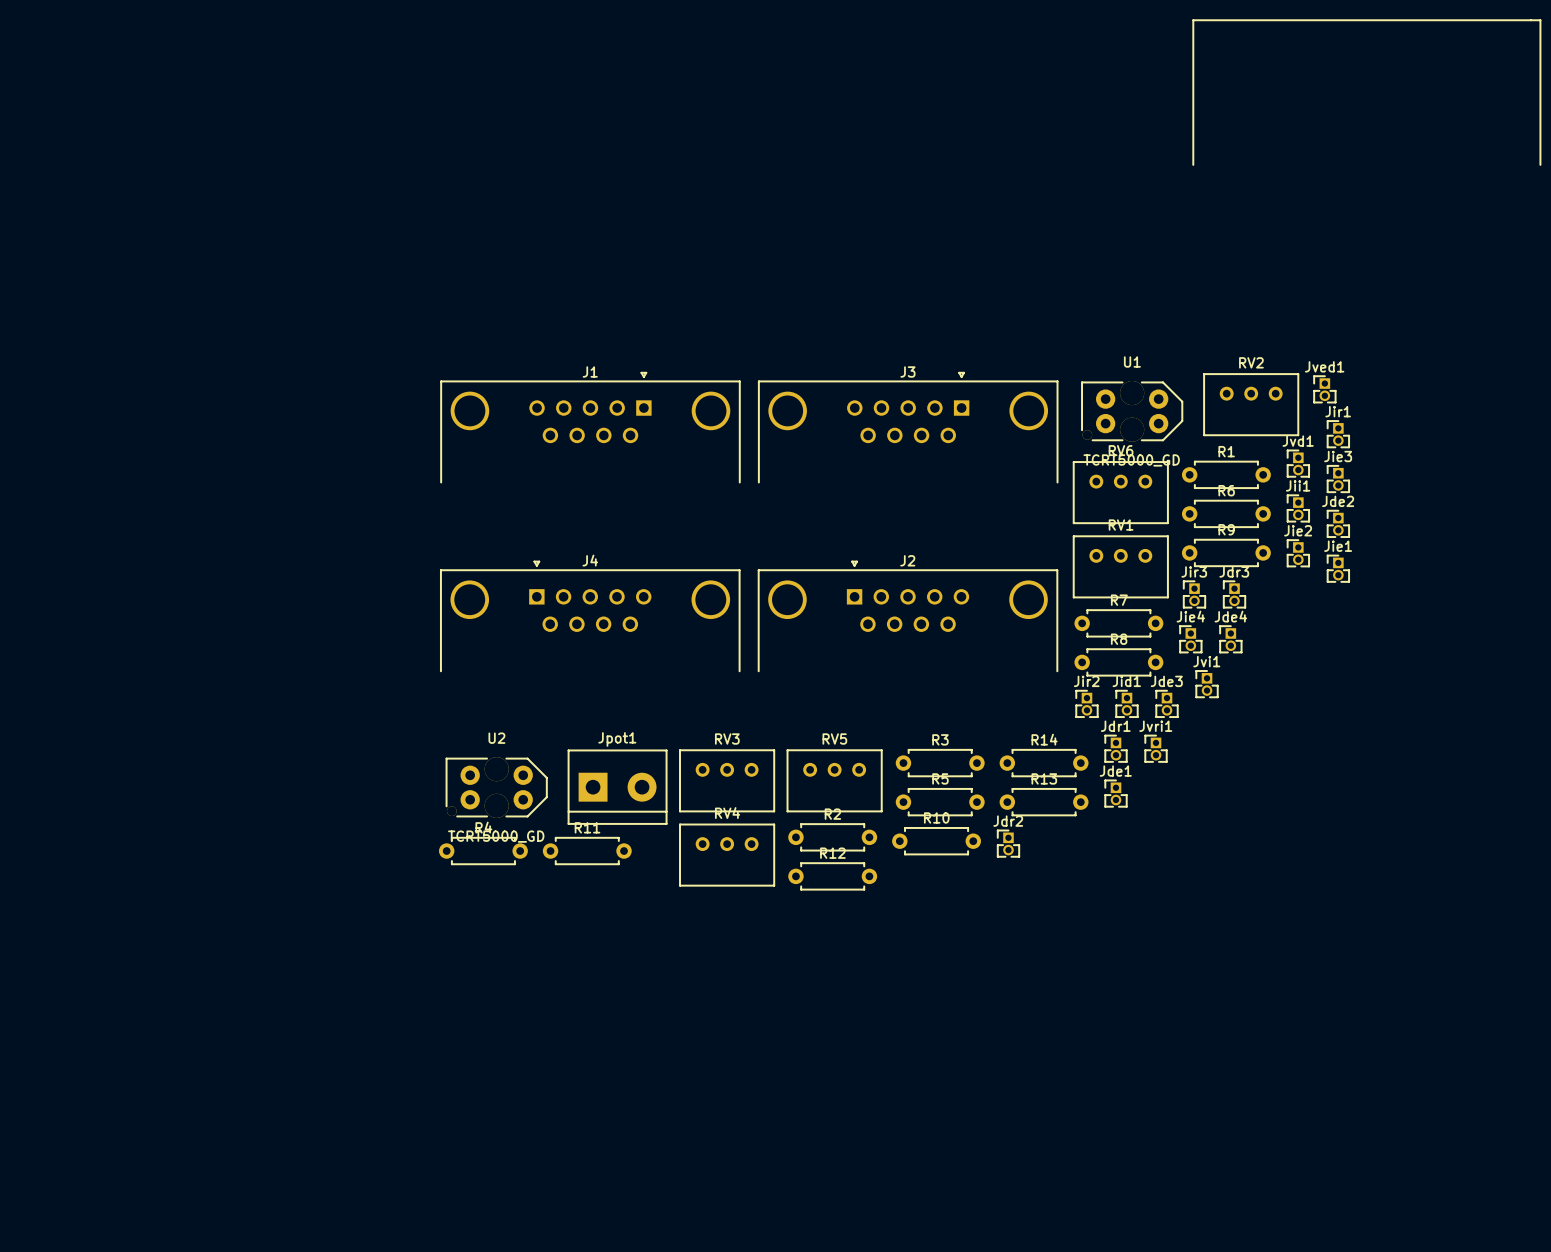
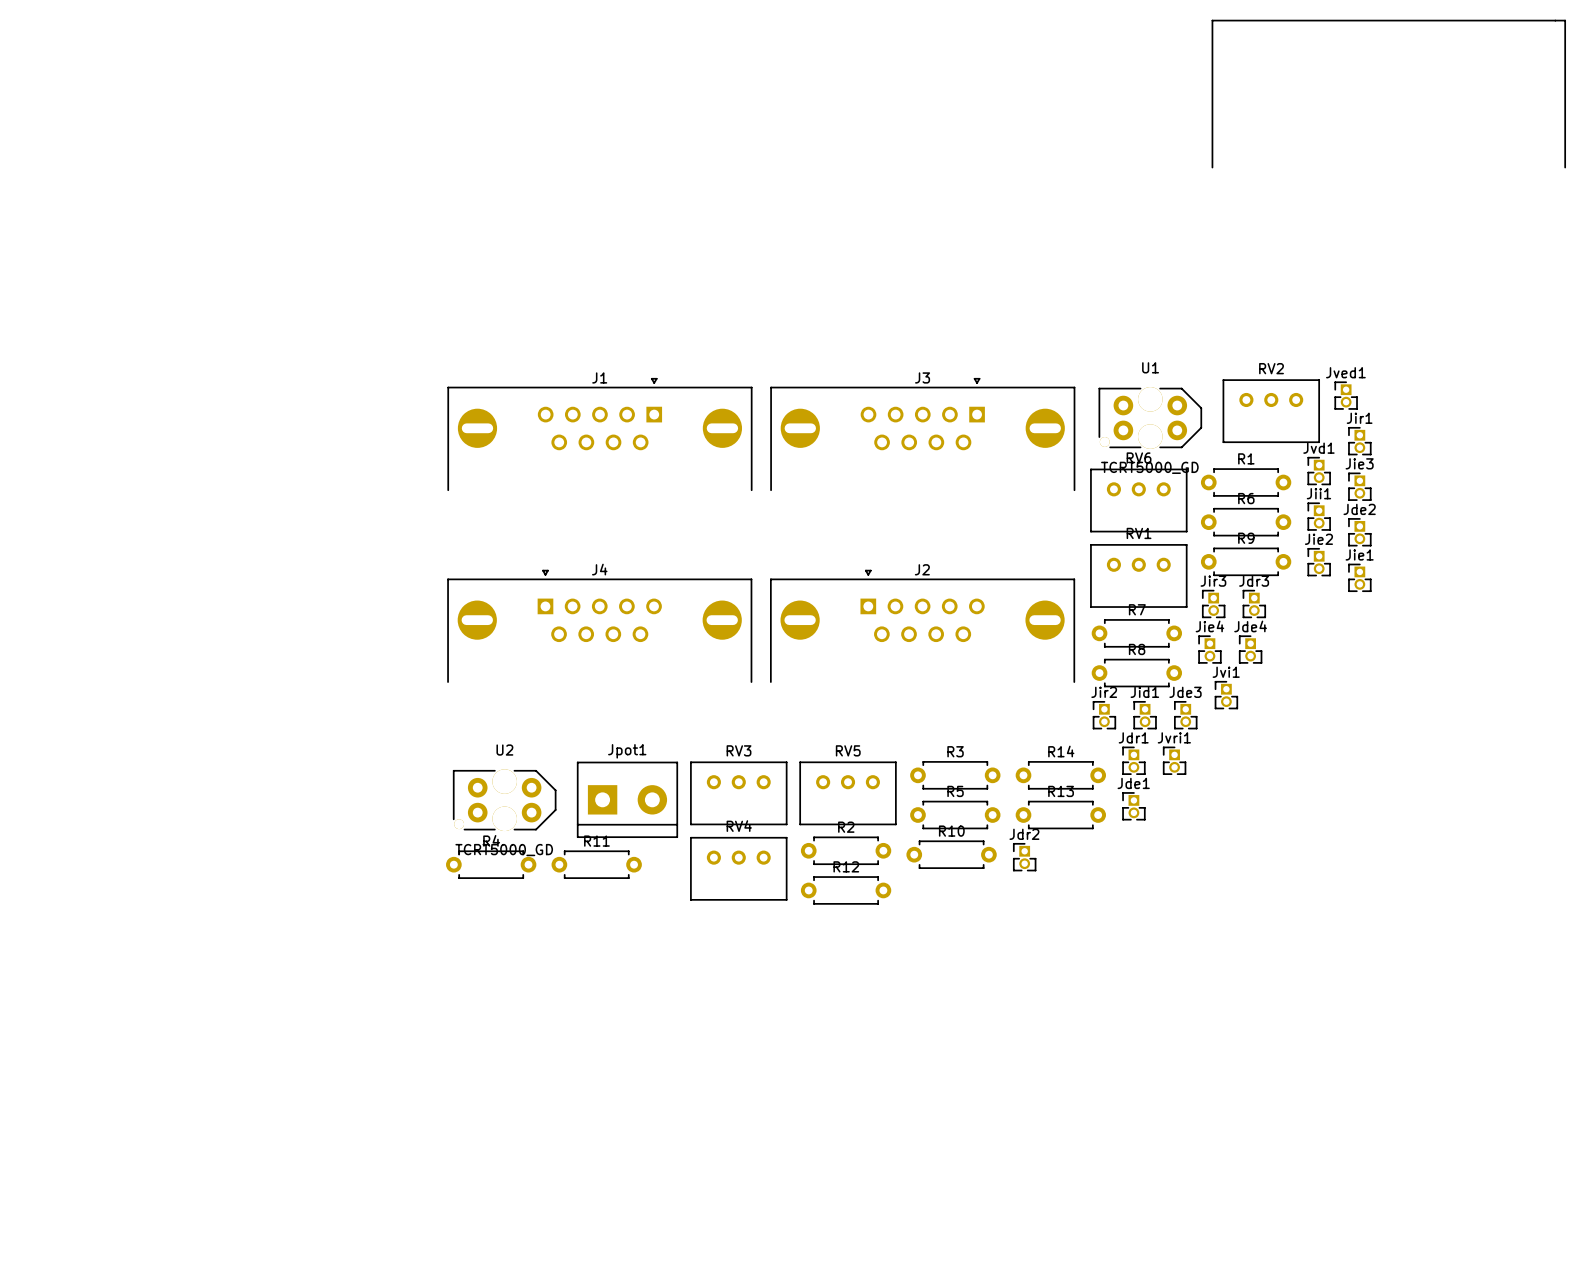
J1 footprint: [440, 372, 741, 484] -> [447, 378, 753, 491]
J3 footprint: [758, 372, 1059, 484] -> [770, 378, 1076, 491]
J4 footprint: [440, 561, 741, 672] -> [447, 570, 753, 683]
J2 footprint: [758, 561, 1058, 672] -> [770, 570, 1075, 683]

